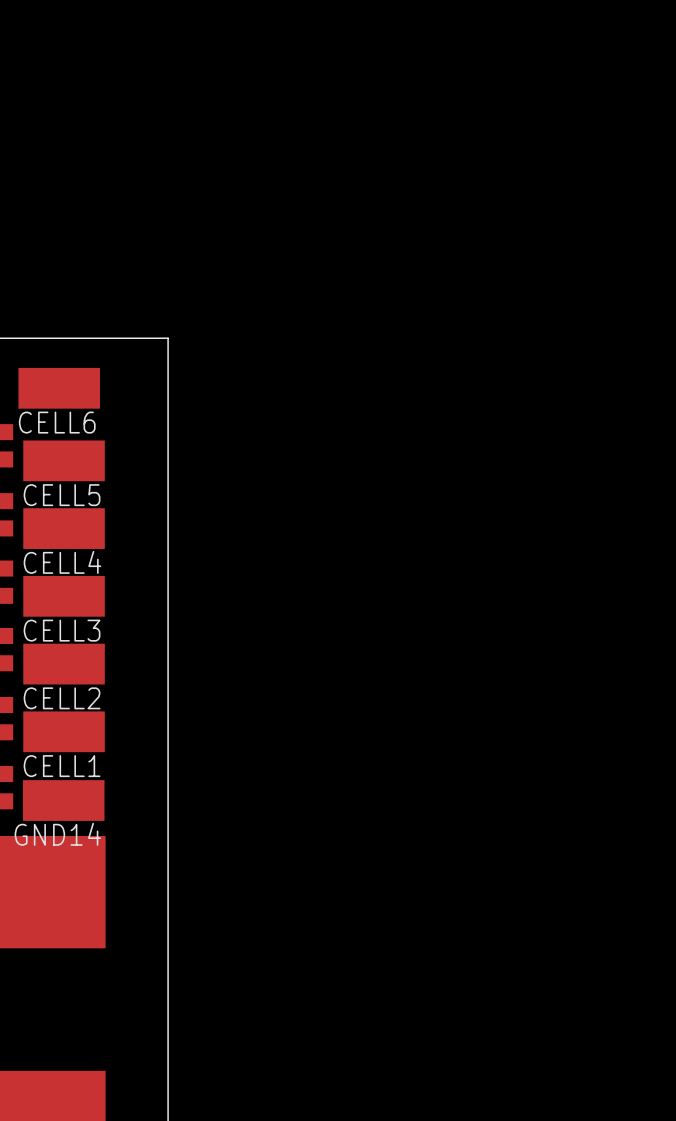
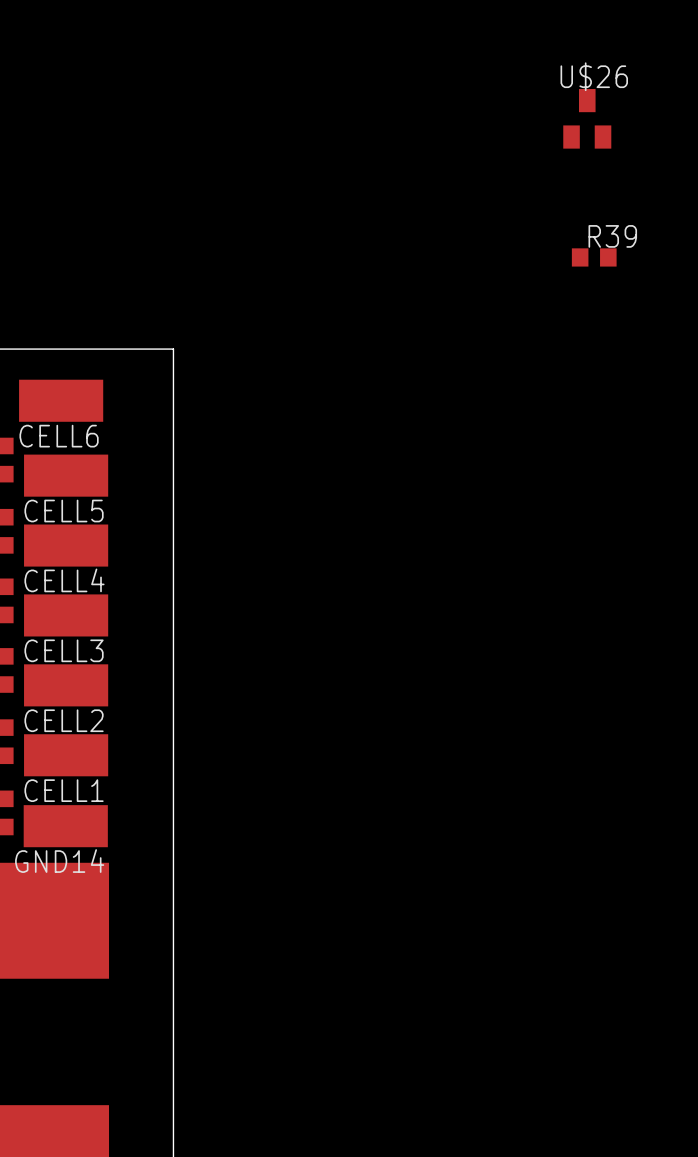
U$26: none -> (587, 118)
R39: none -> (594, 257)

